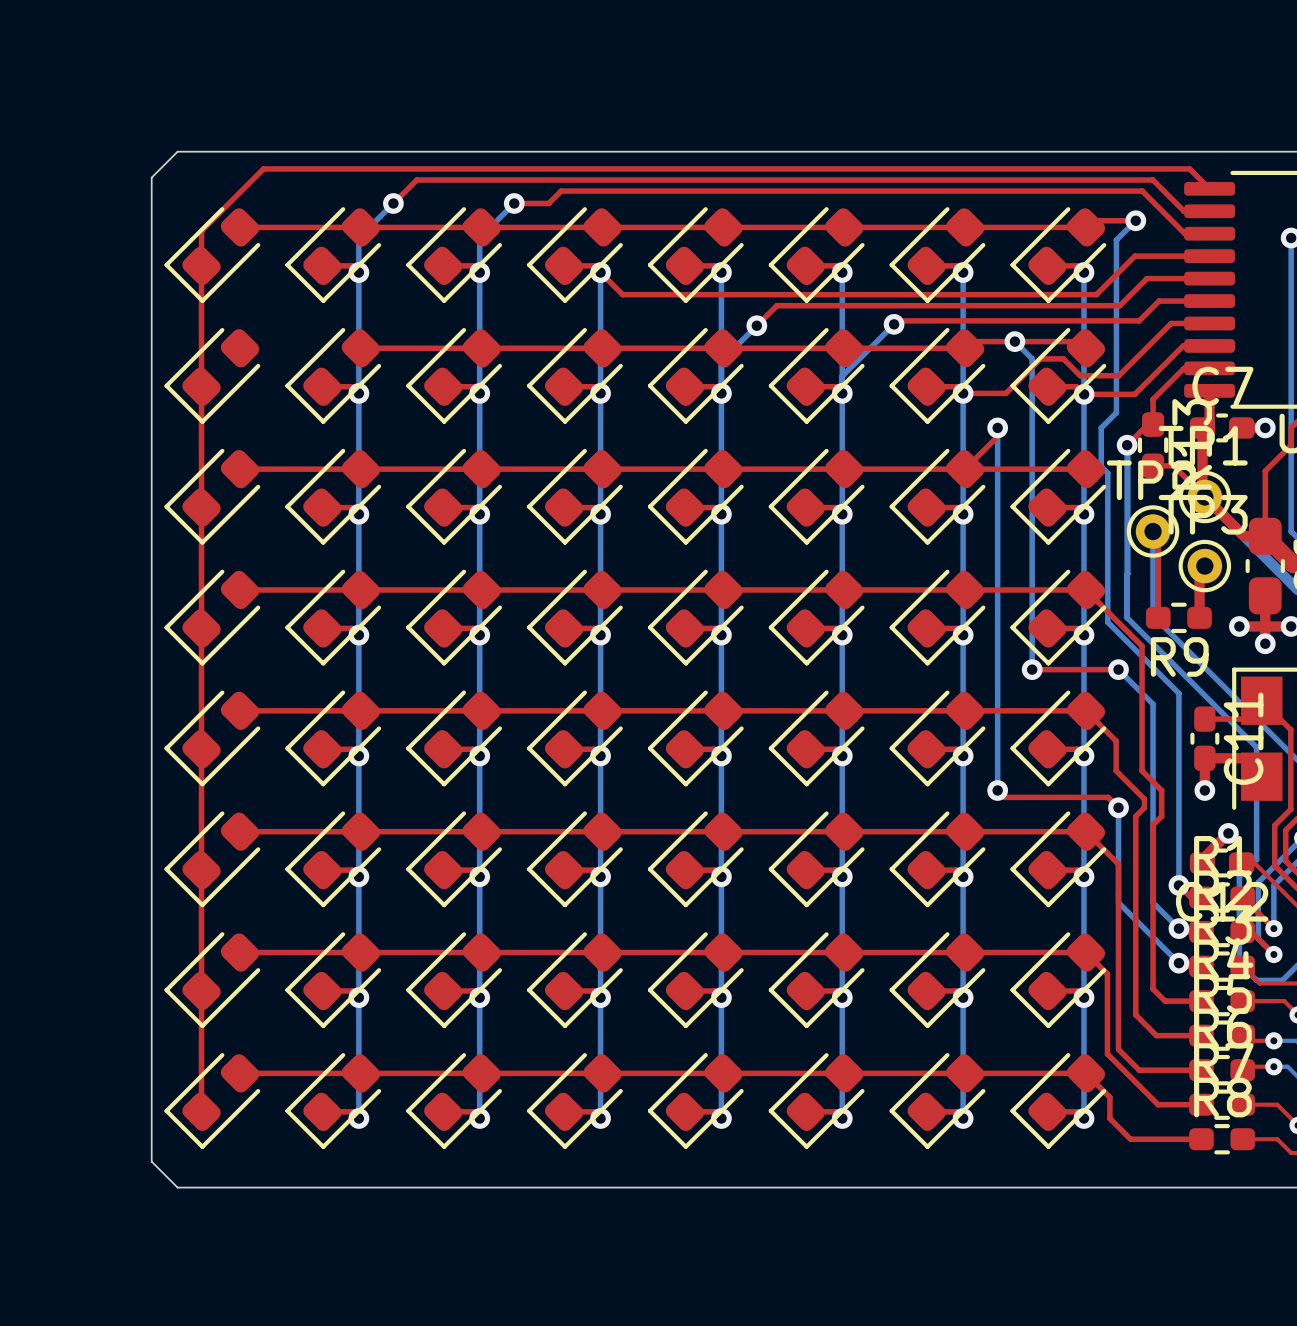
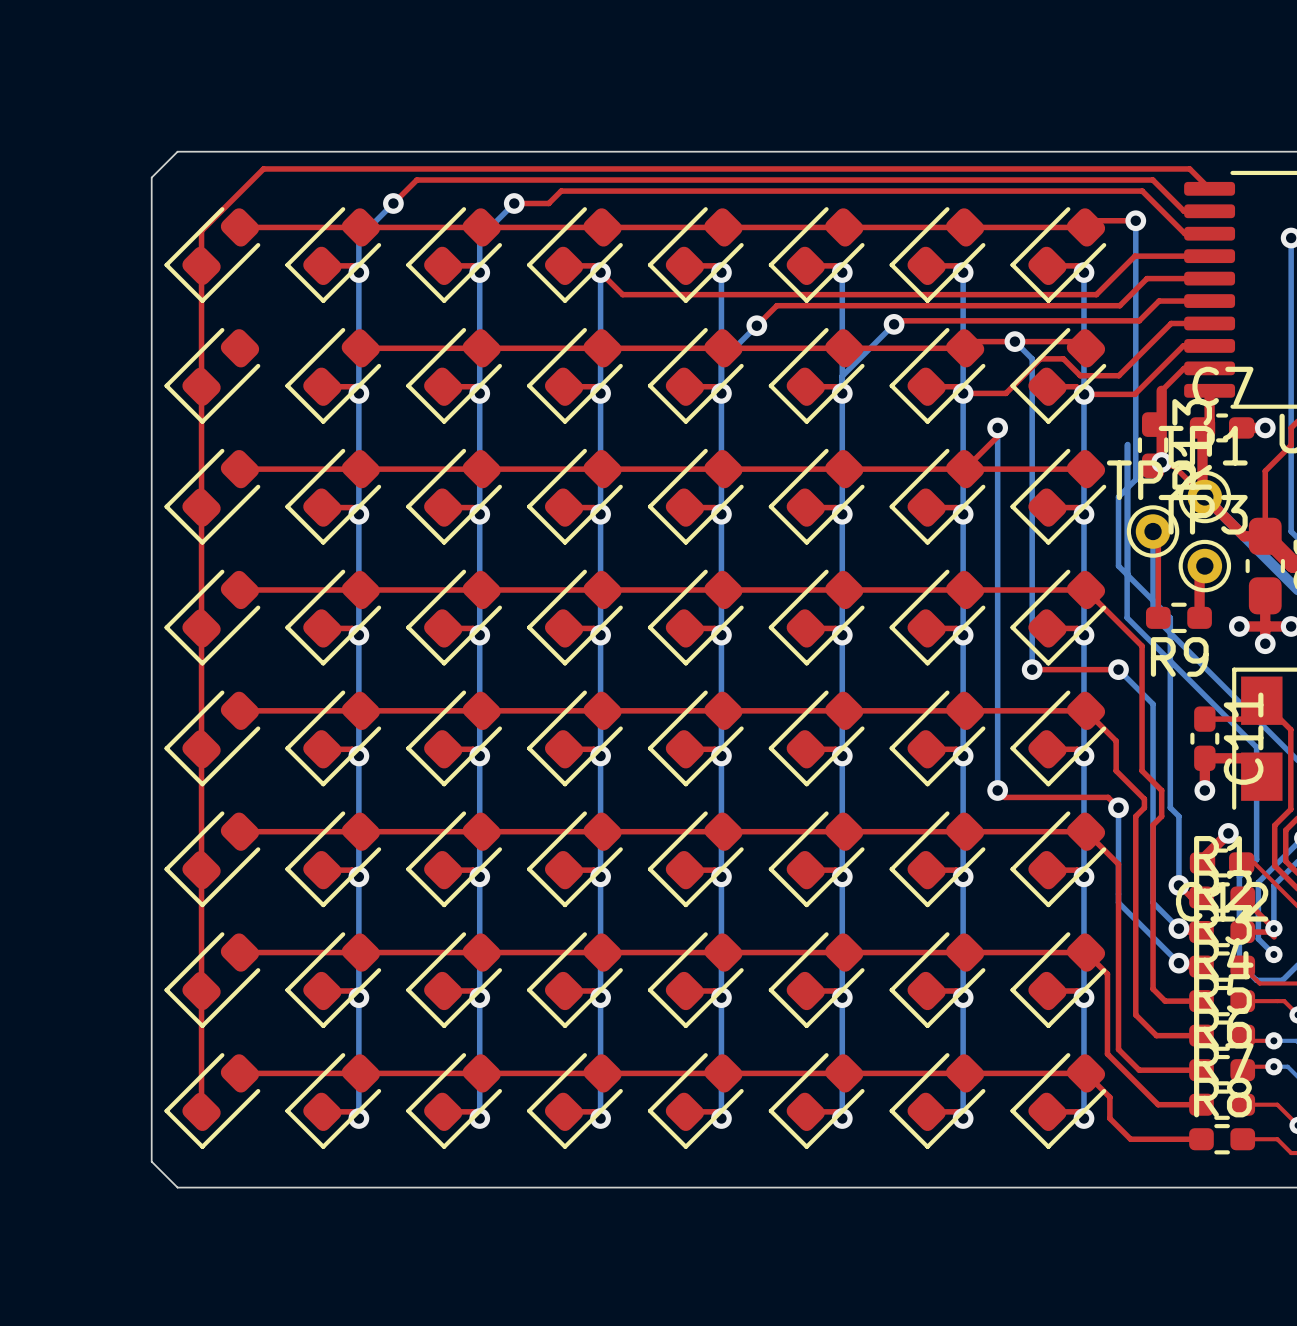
bottom track: (1135, 220) (1116, 240) (1116, 412) (1101, 427) (1101, 466) (1107, 473) (1107, 622) (1178, 693) (1178, 816) -> (1135, 220) (1135, 479) (1118, 496) (1118, 566) (1170, 617) (1170, 807) (1178, 816)
top track: (1161, 390) (1153, 399) (1153, 424) (1147, 424) (1127, 445) -> (1161, 390) (1161, 462)
via position: (1127, 445) -> (1161, 462)
top track: (1251, 932) (1273, 954) -> (1251, 932) (1269, 932) (1274, 936)

